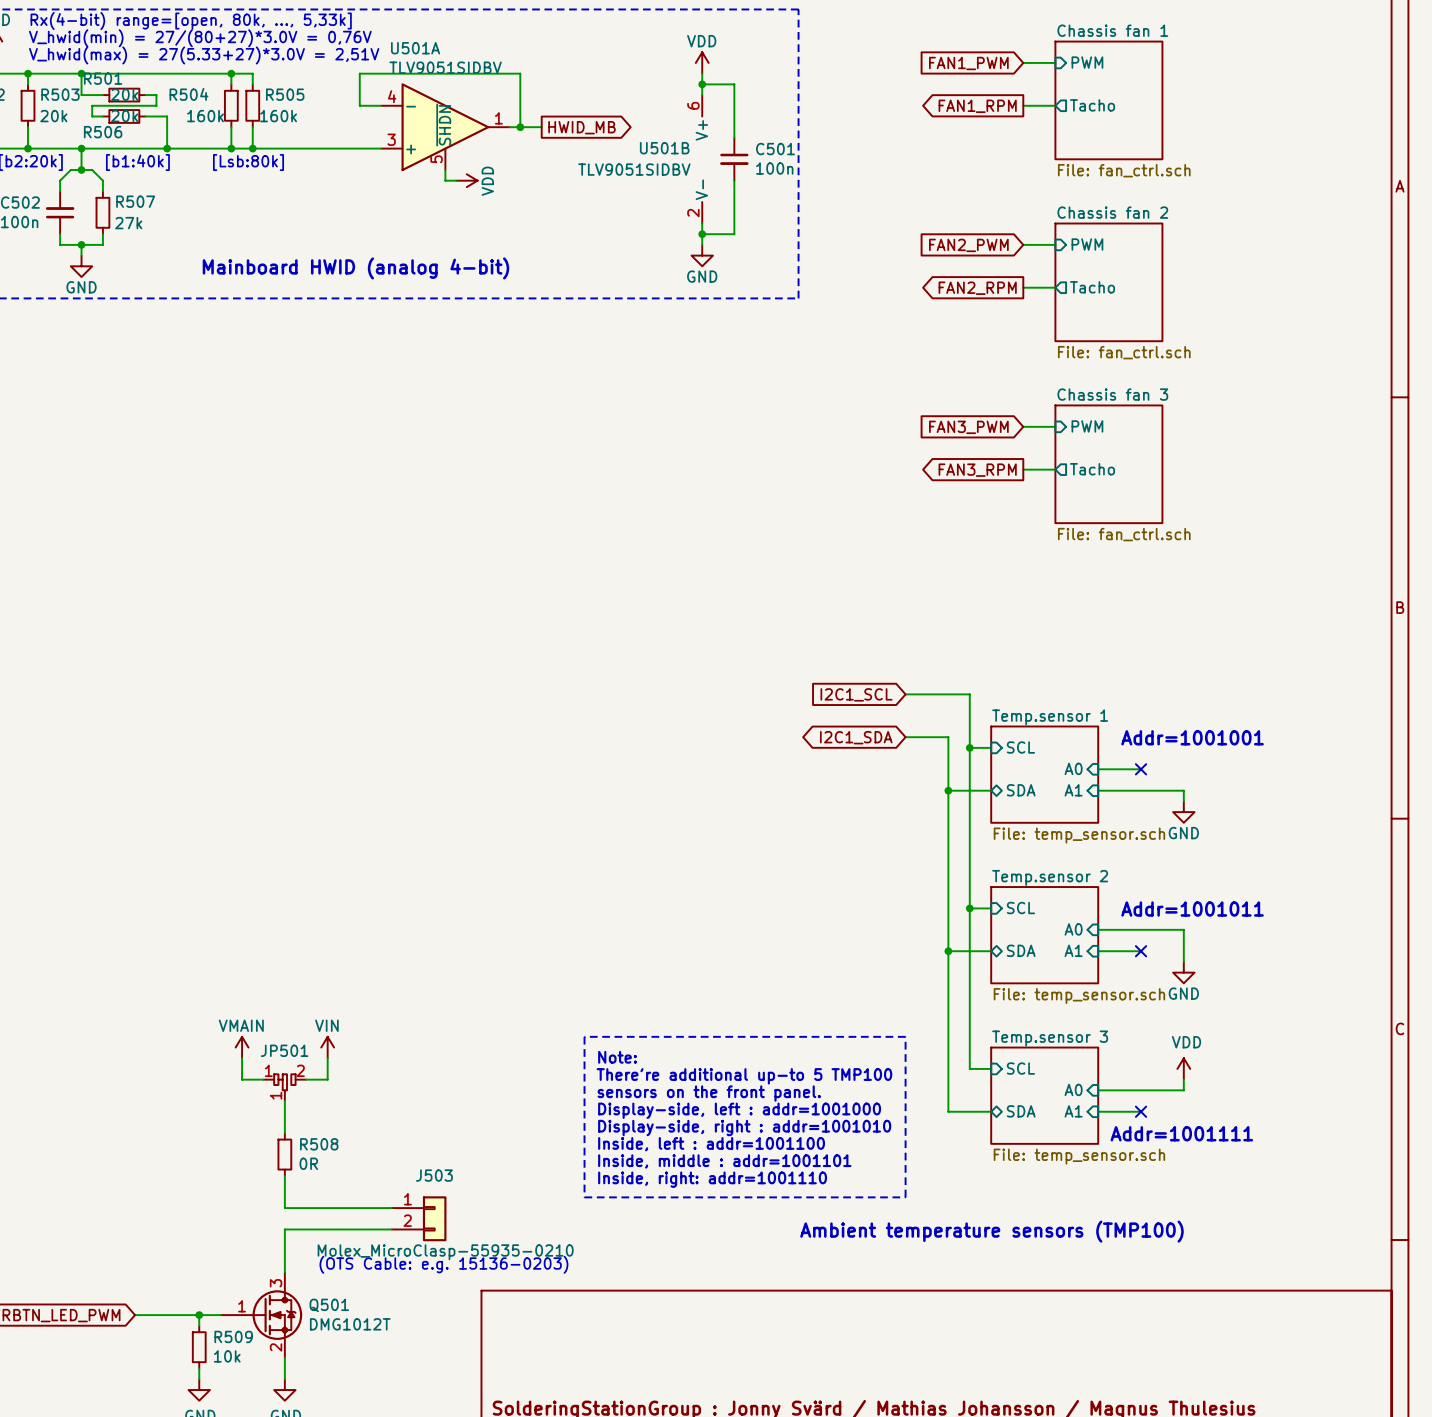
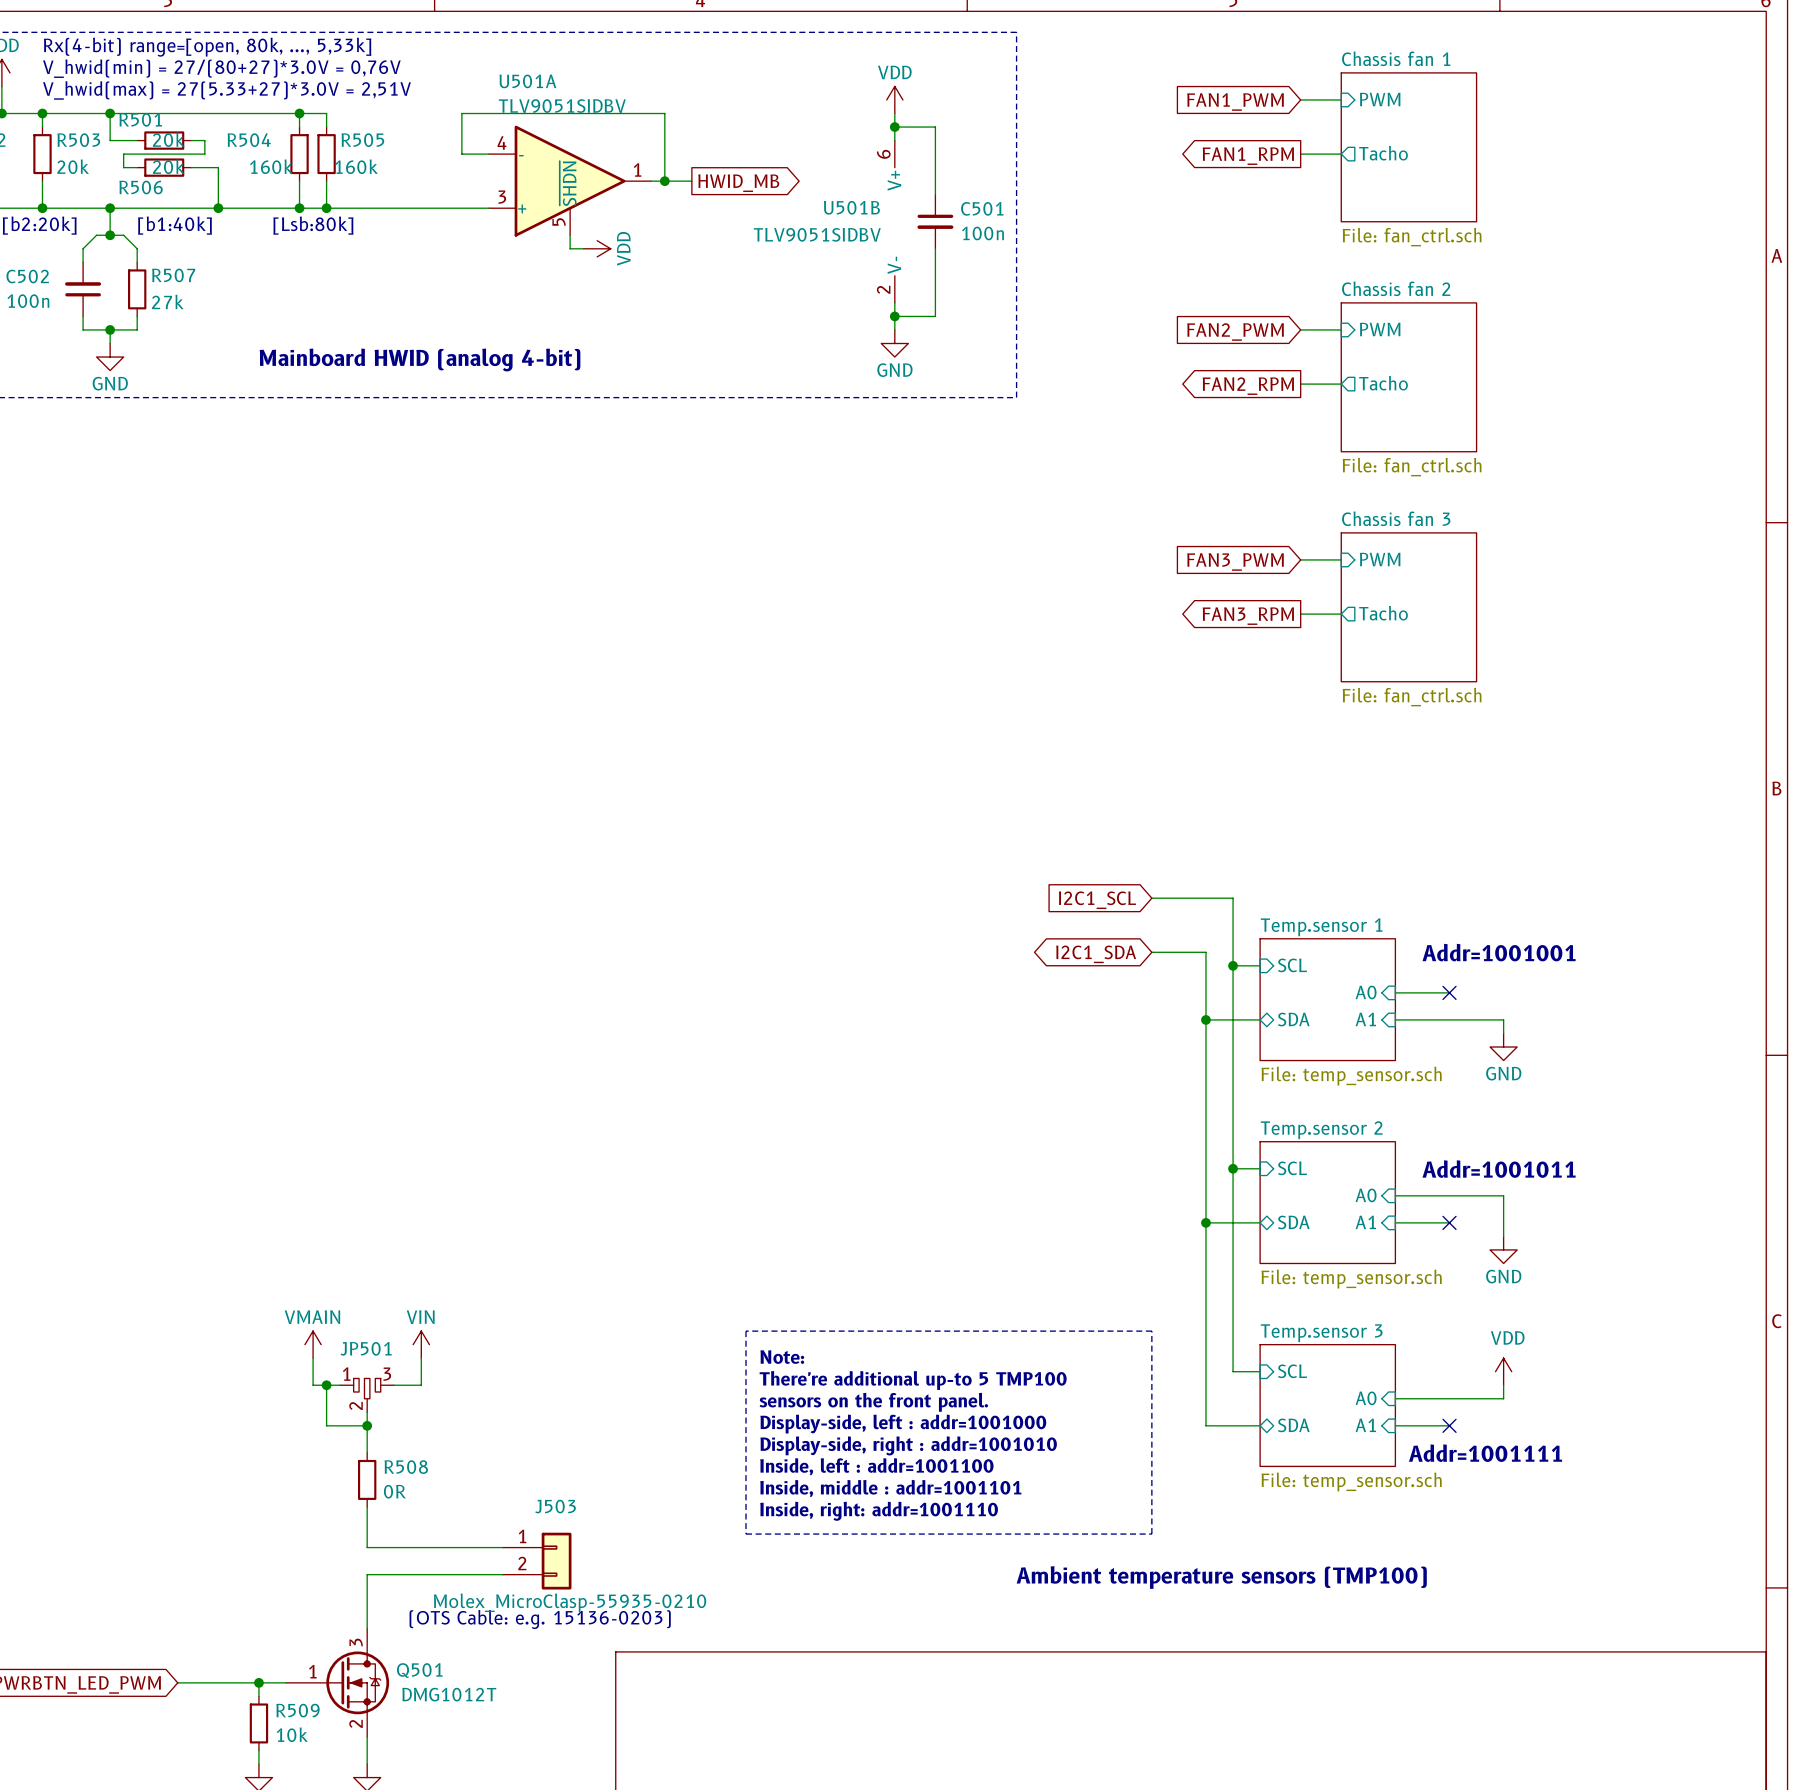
JP501 symbol: [263, 1074, 307, 1102] -> [340, 1378, 395, 1413]
wire: none -> (326, 1385) (326, 1425) (367, 1425)
junction: none -> (326, 1385)
junction: none -> (367, 1425)

